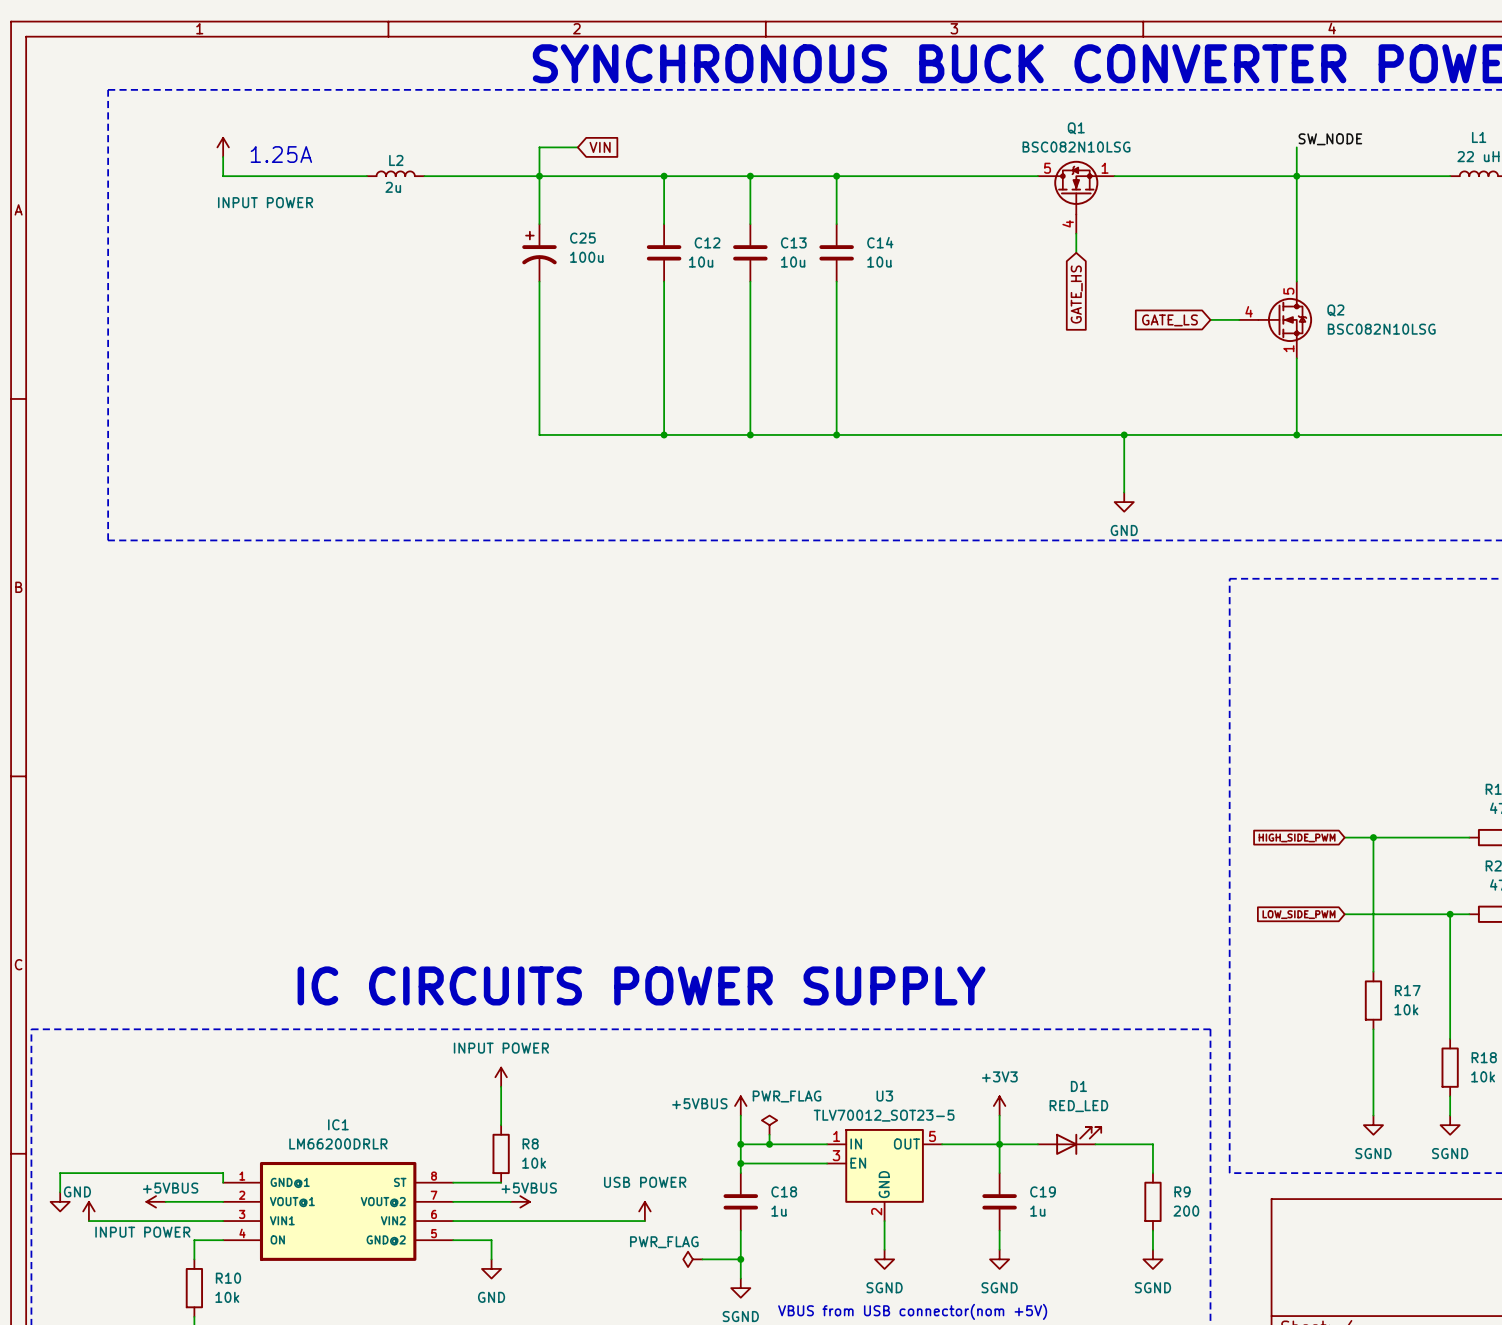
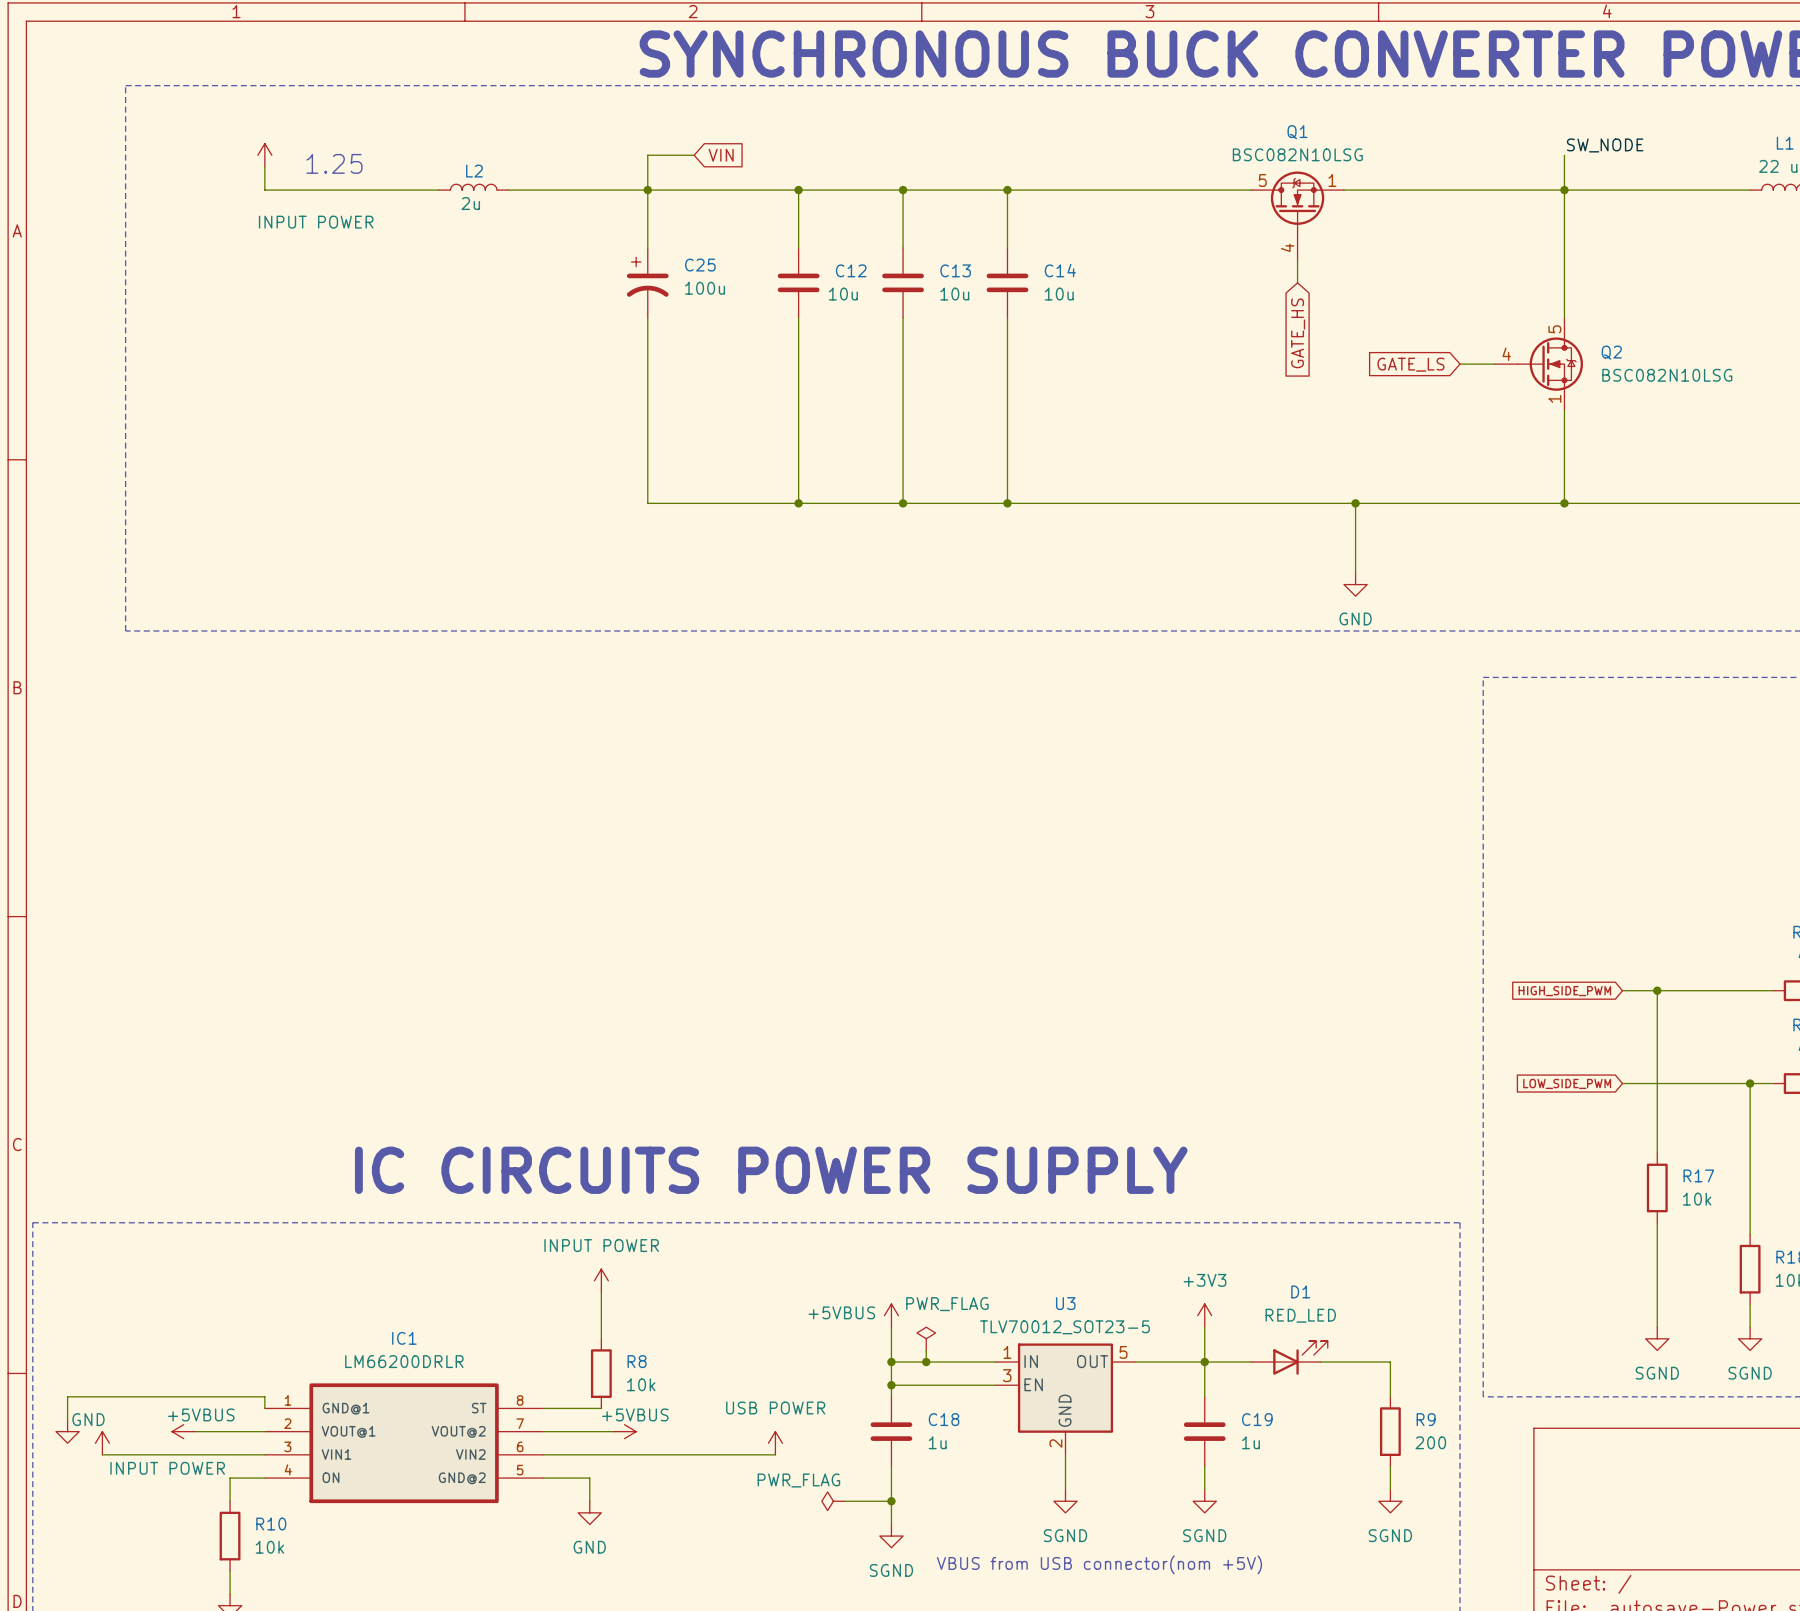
text: 1.25A (281, 154) -> 1.25 (334, 163)

